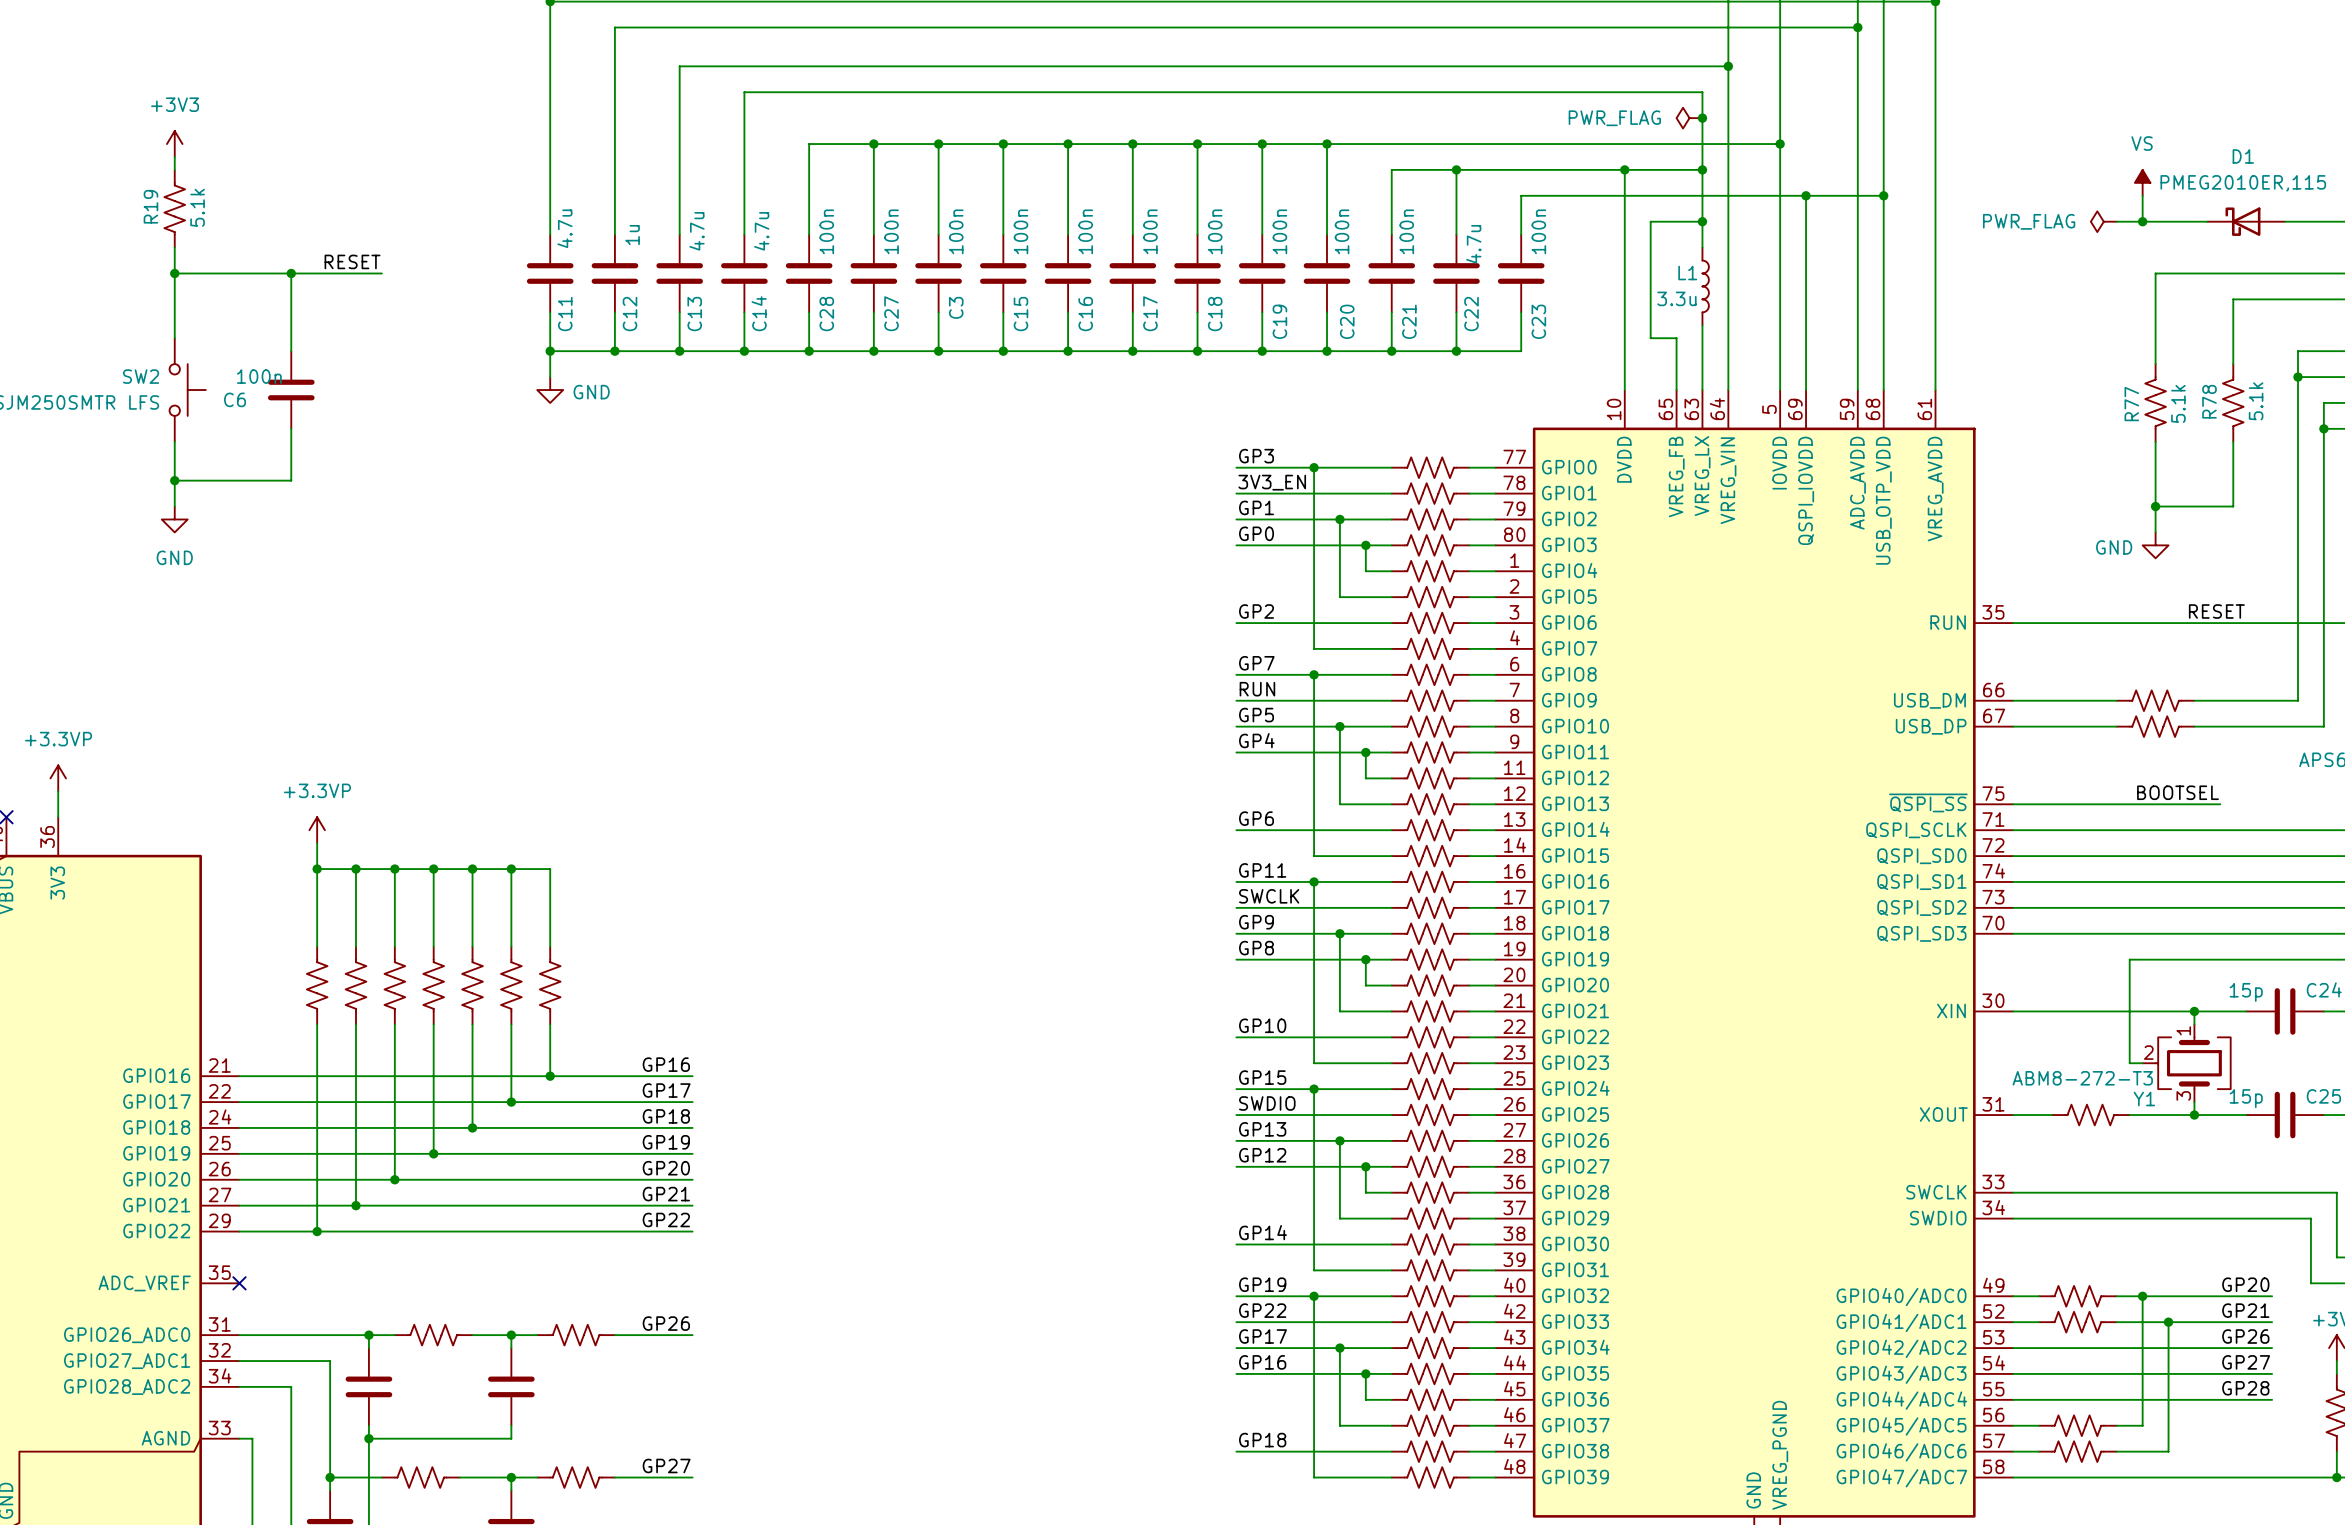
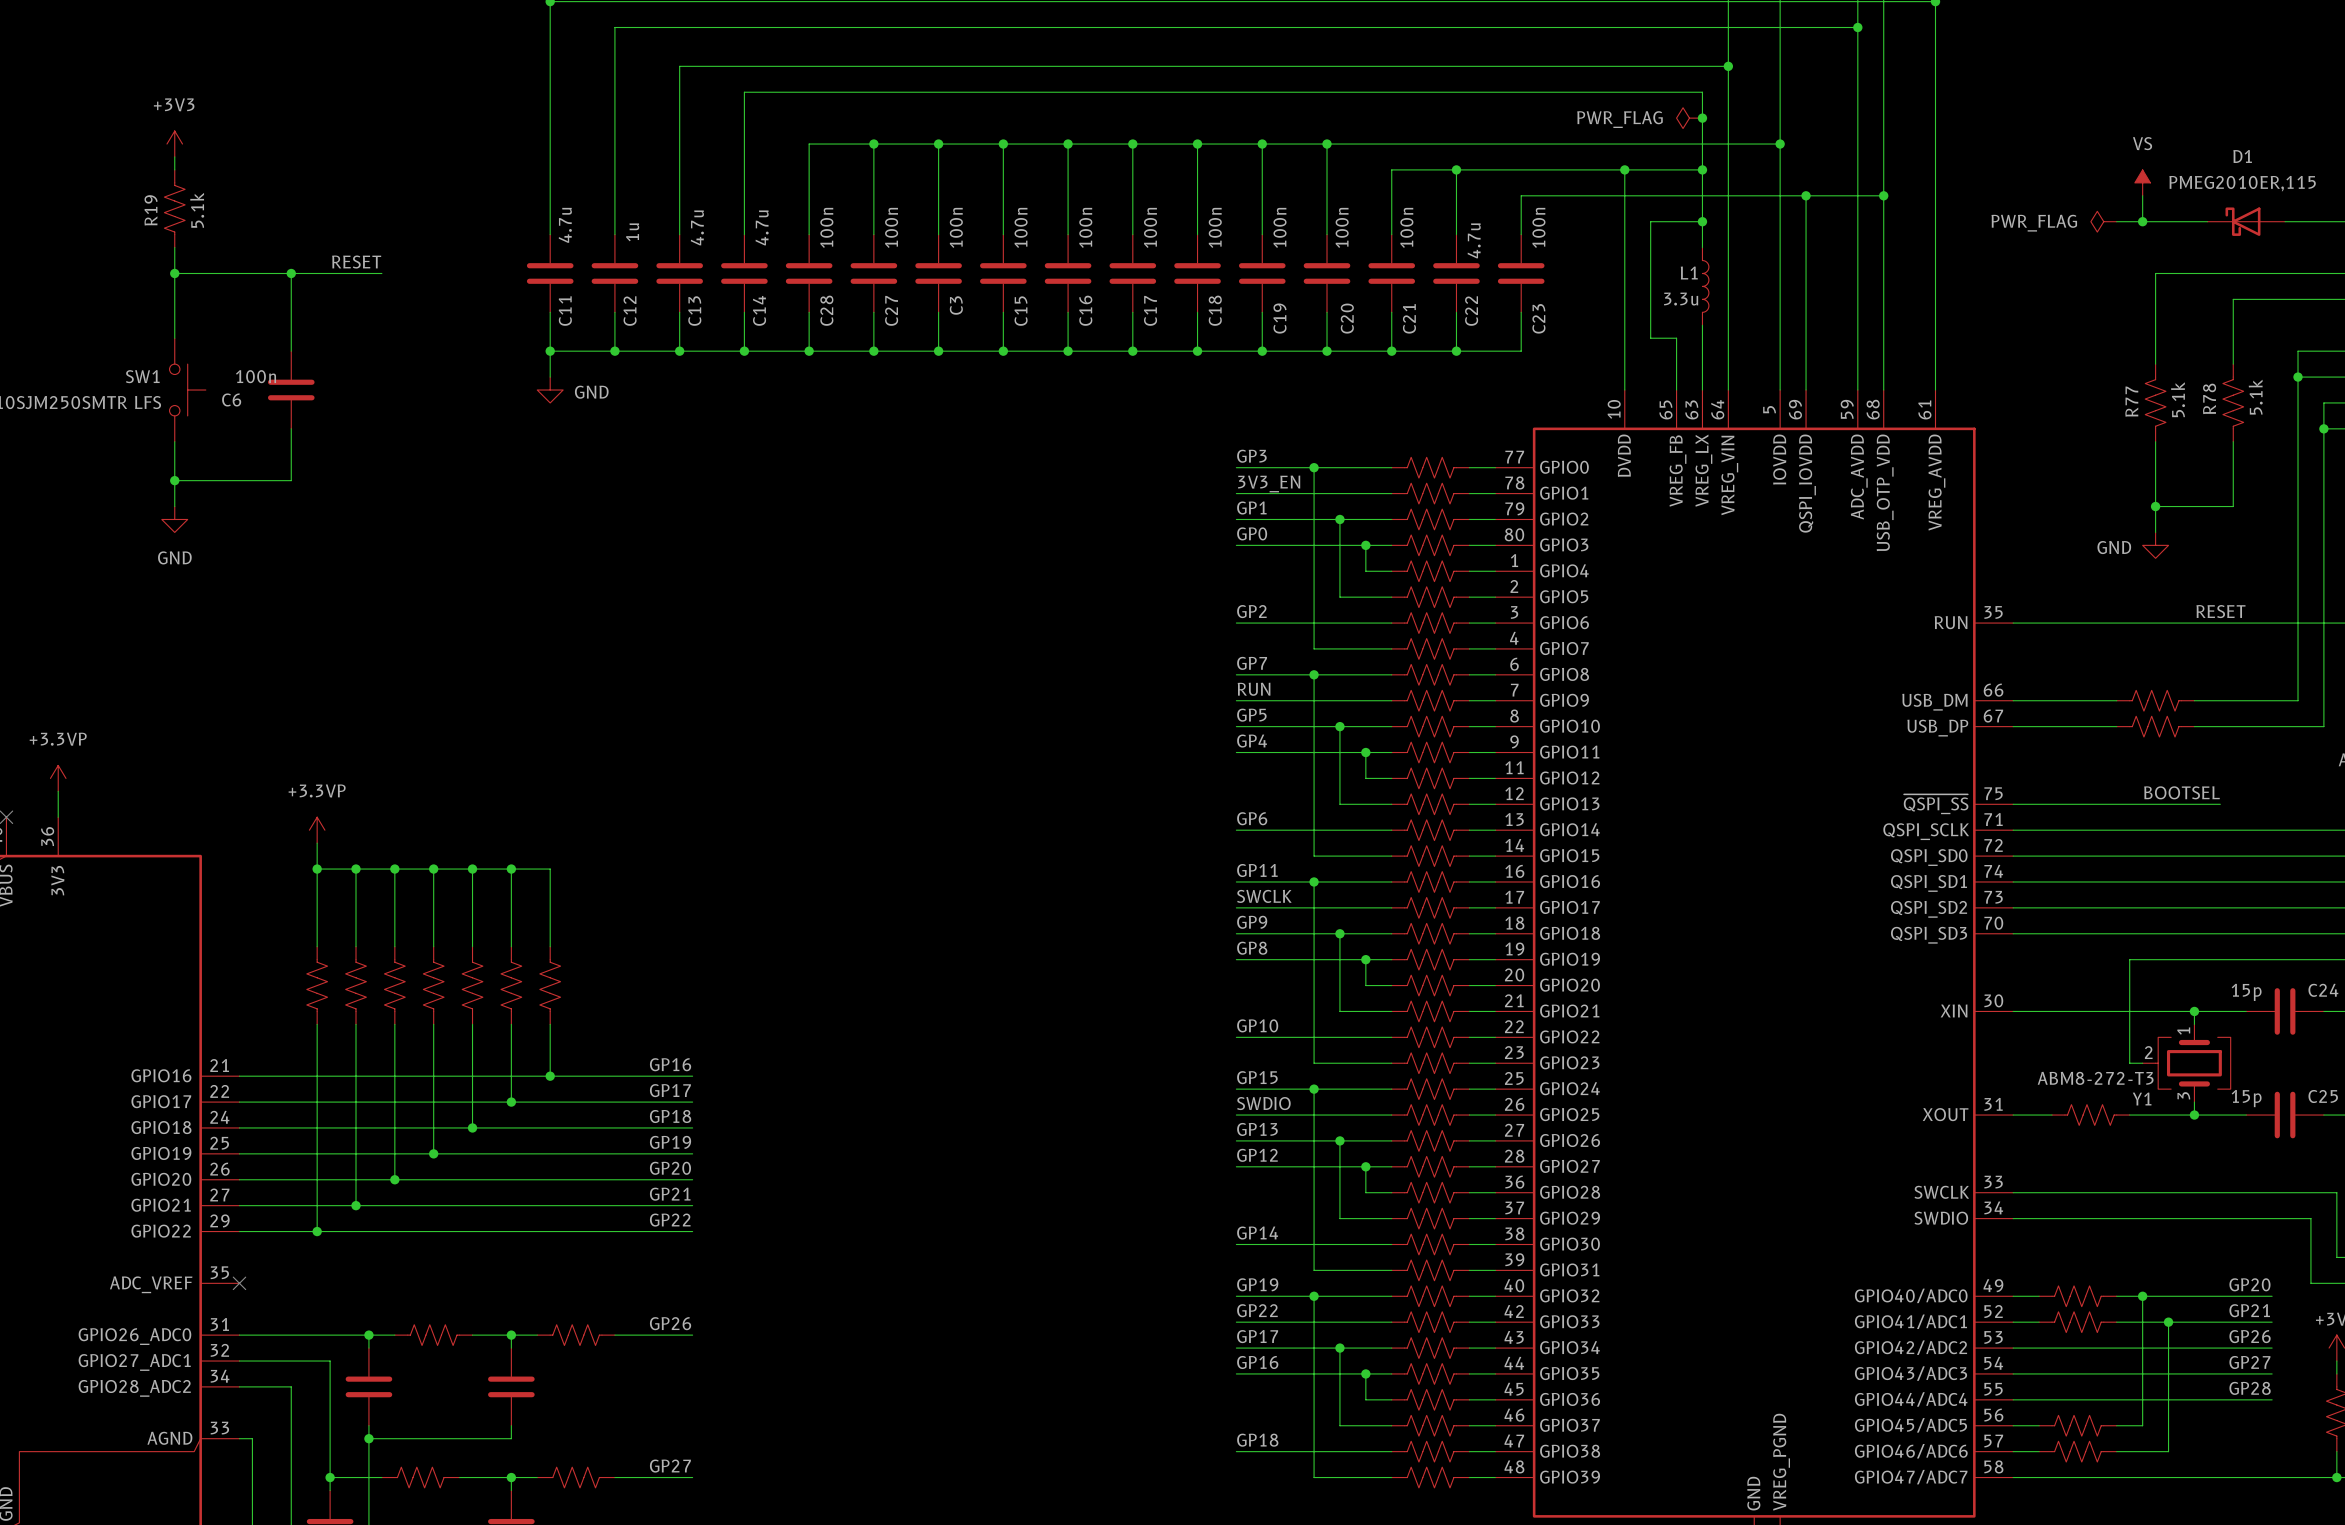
SW2 name: SW2 (141, 376) -> SW1 (142, 376)

